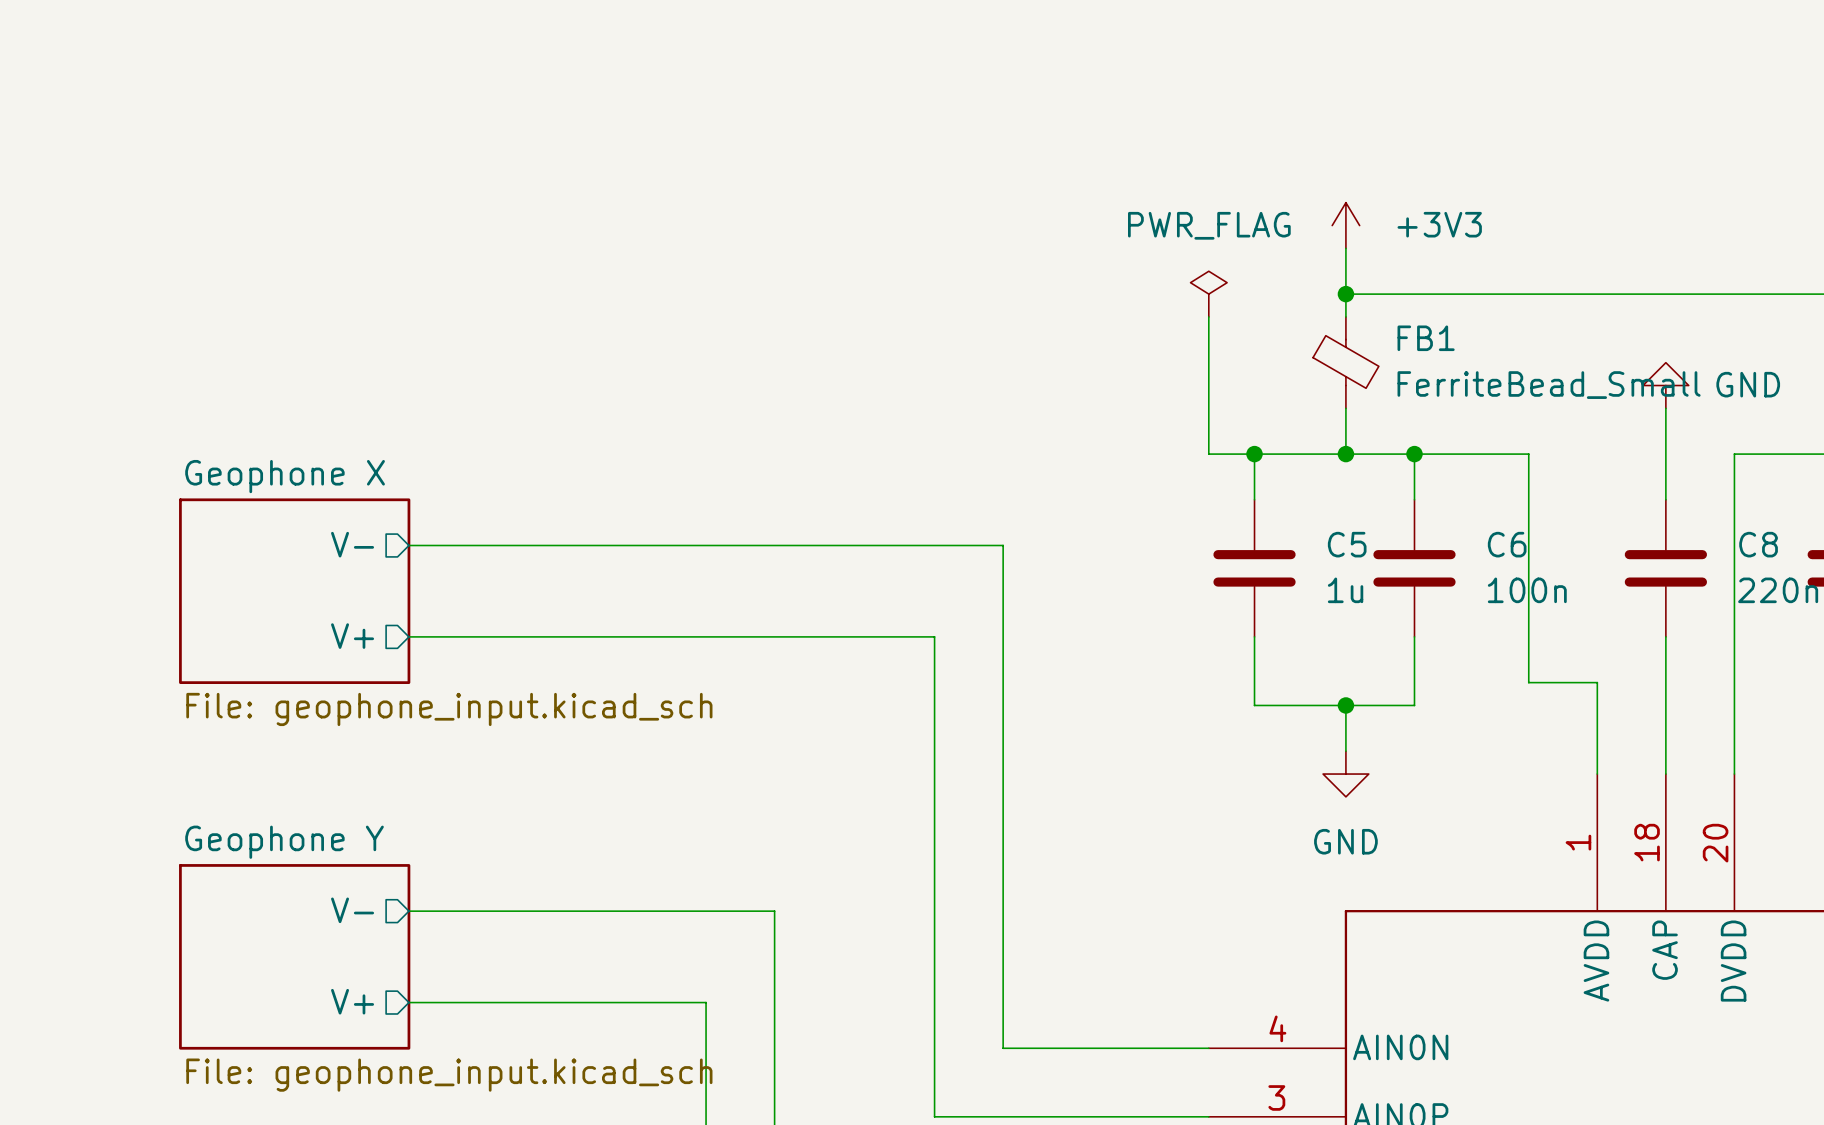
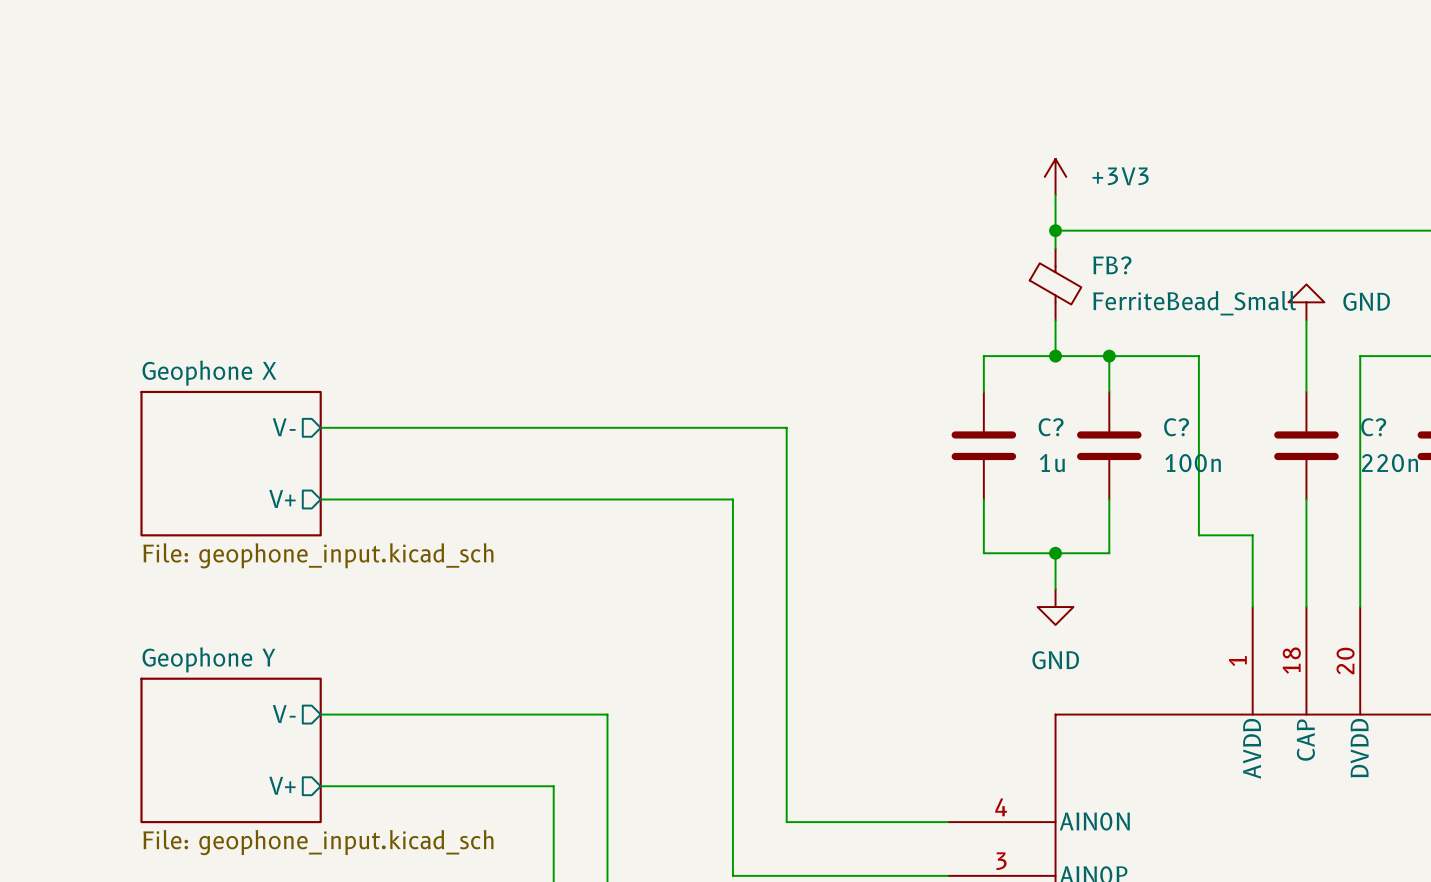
power symbol: PWR_FLAG (1208, 294) -> none
wire: (1208, 316) (1208, 454) (1254, 454) -> none
FB1 name: FB1 (1426, 338) -> FB? (1112, 265)
junction: (1254, 454) -> none
C5 name: C5 (1347, 544) -> C? (1051, 427)
C6 name: C6 (1507, 544) -> C? (1176, 427)
C8 name: C8 (1758, 544) -> C? (1373, 427)

